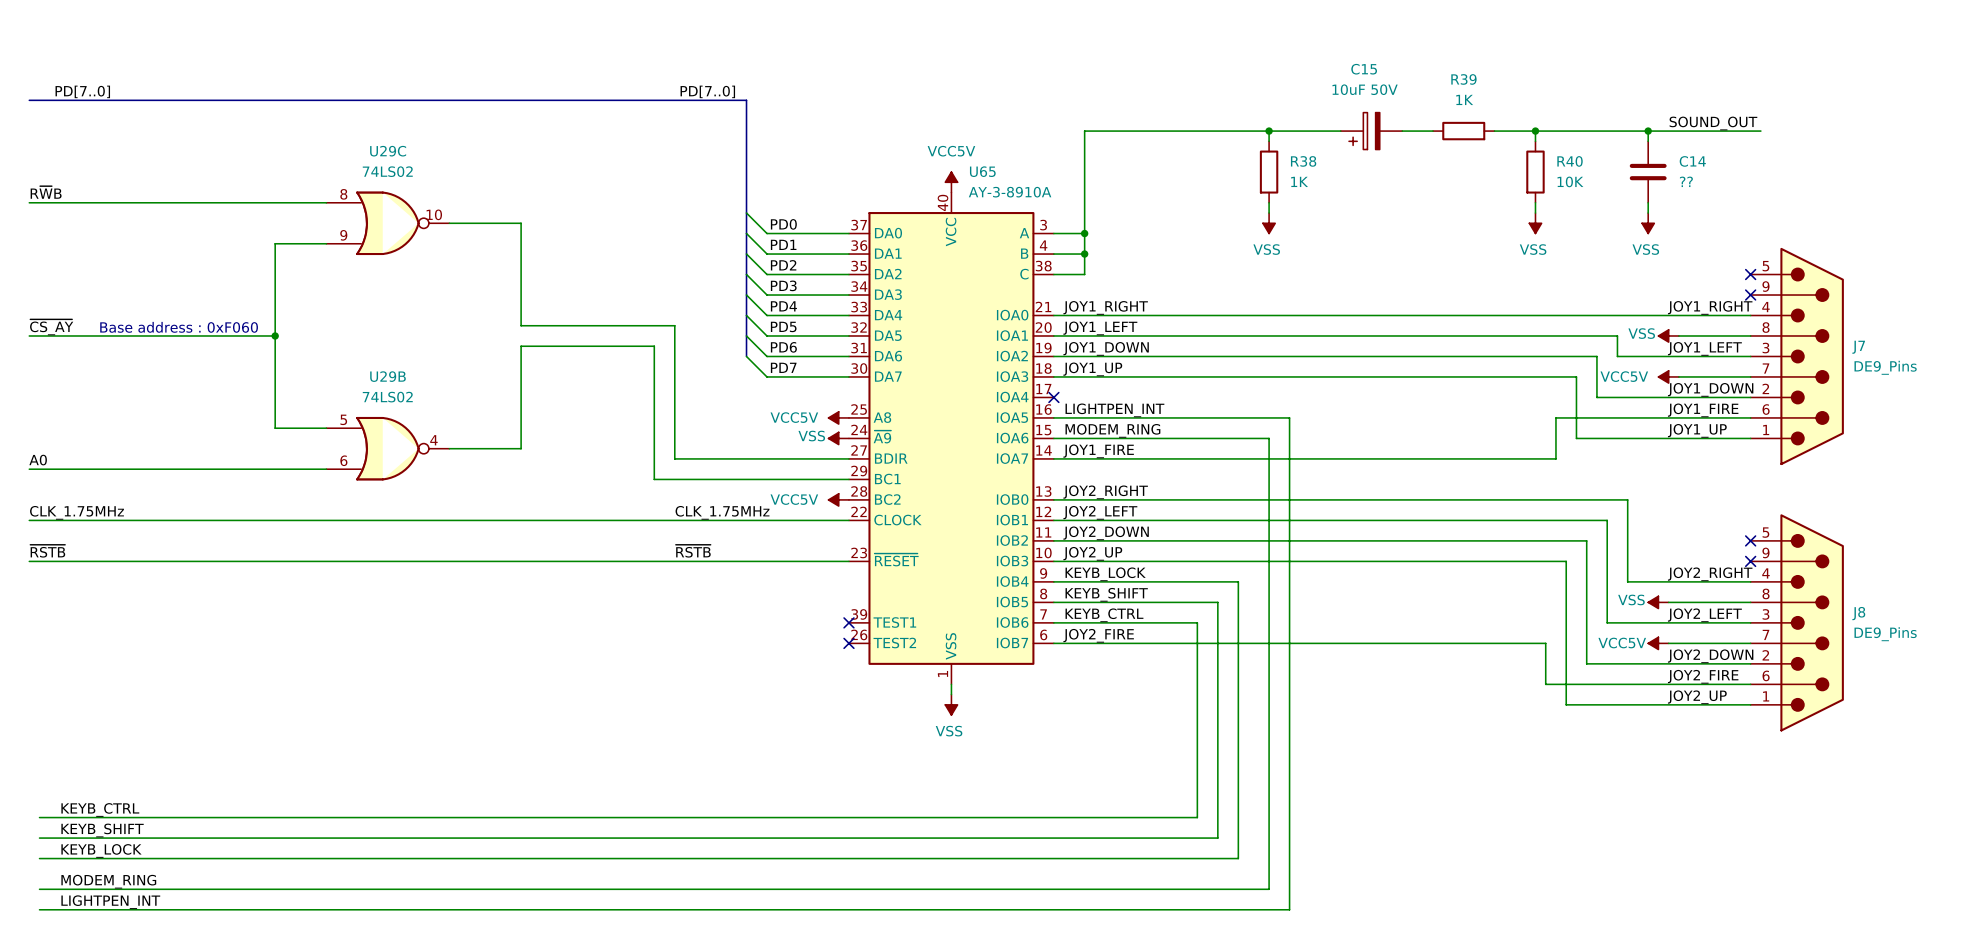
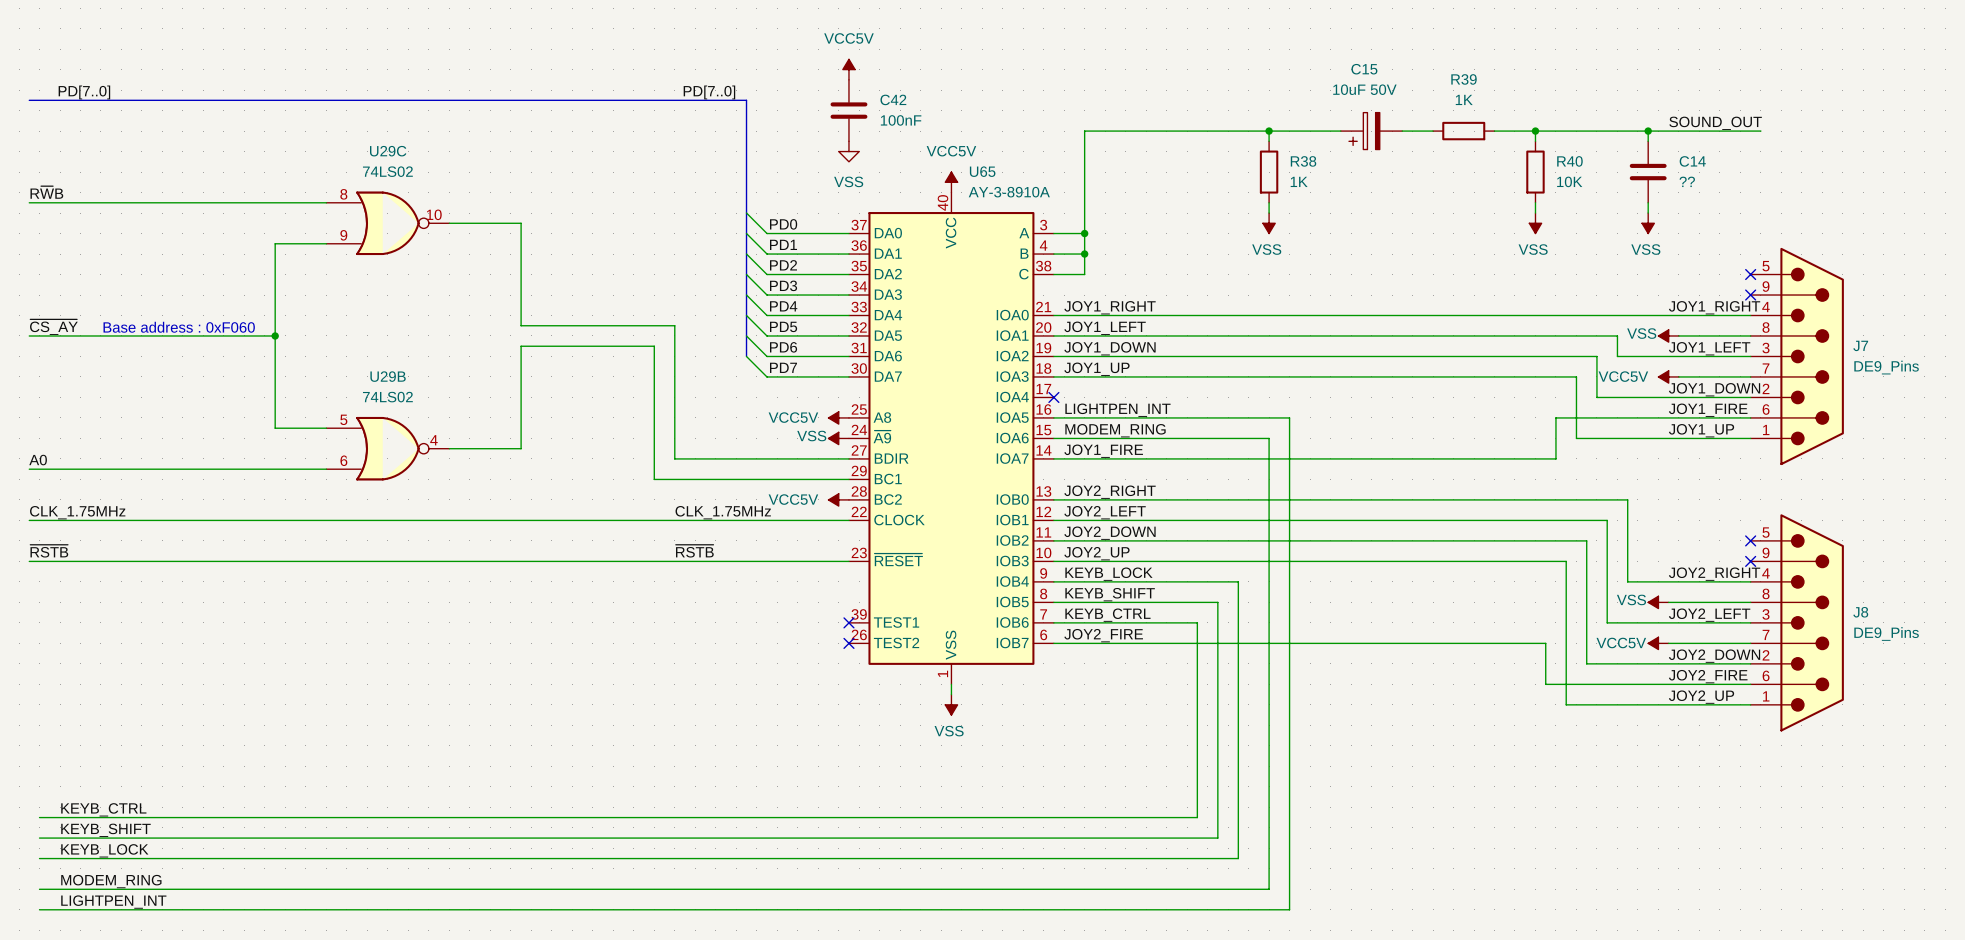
power symbol: none -> VCC5V (848, 69)
C42: none -> 100nF (848, 110)
power symbol: none -> VSS (848, 151)

